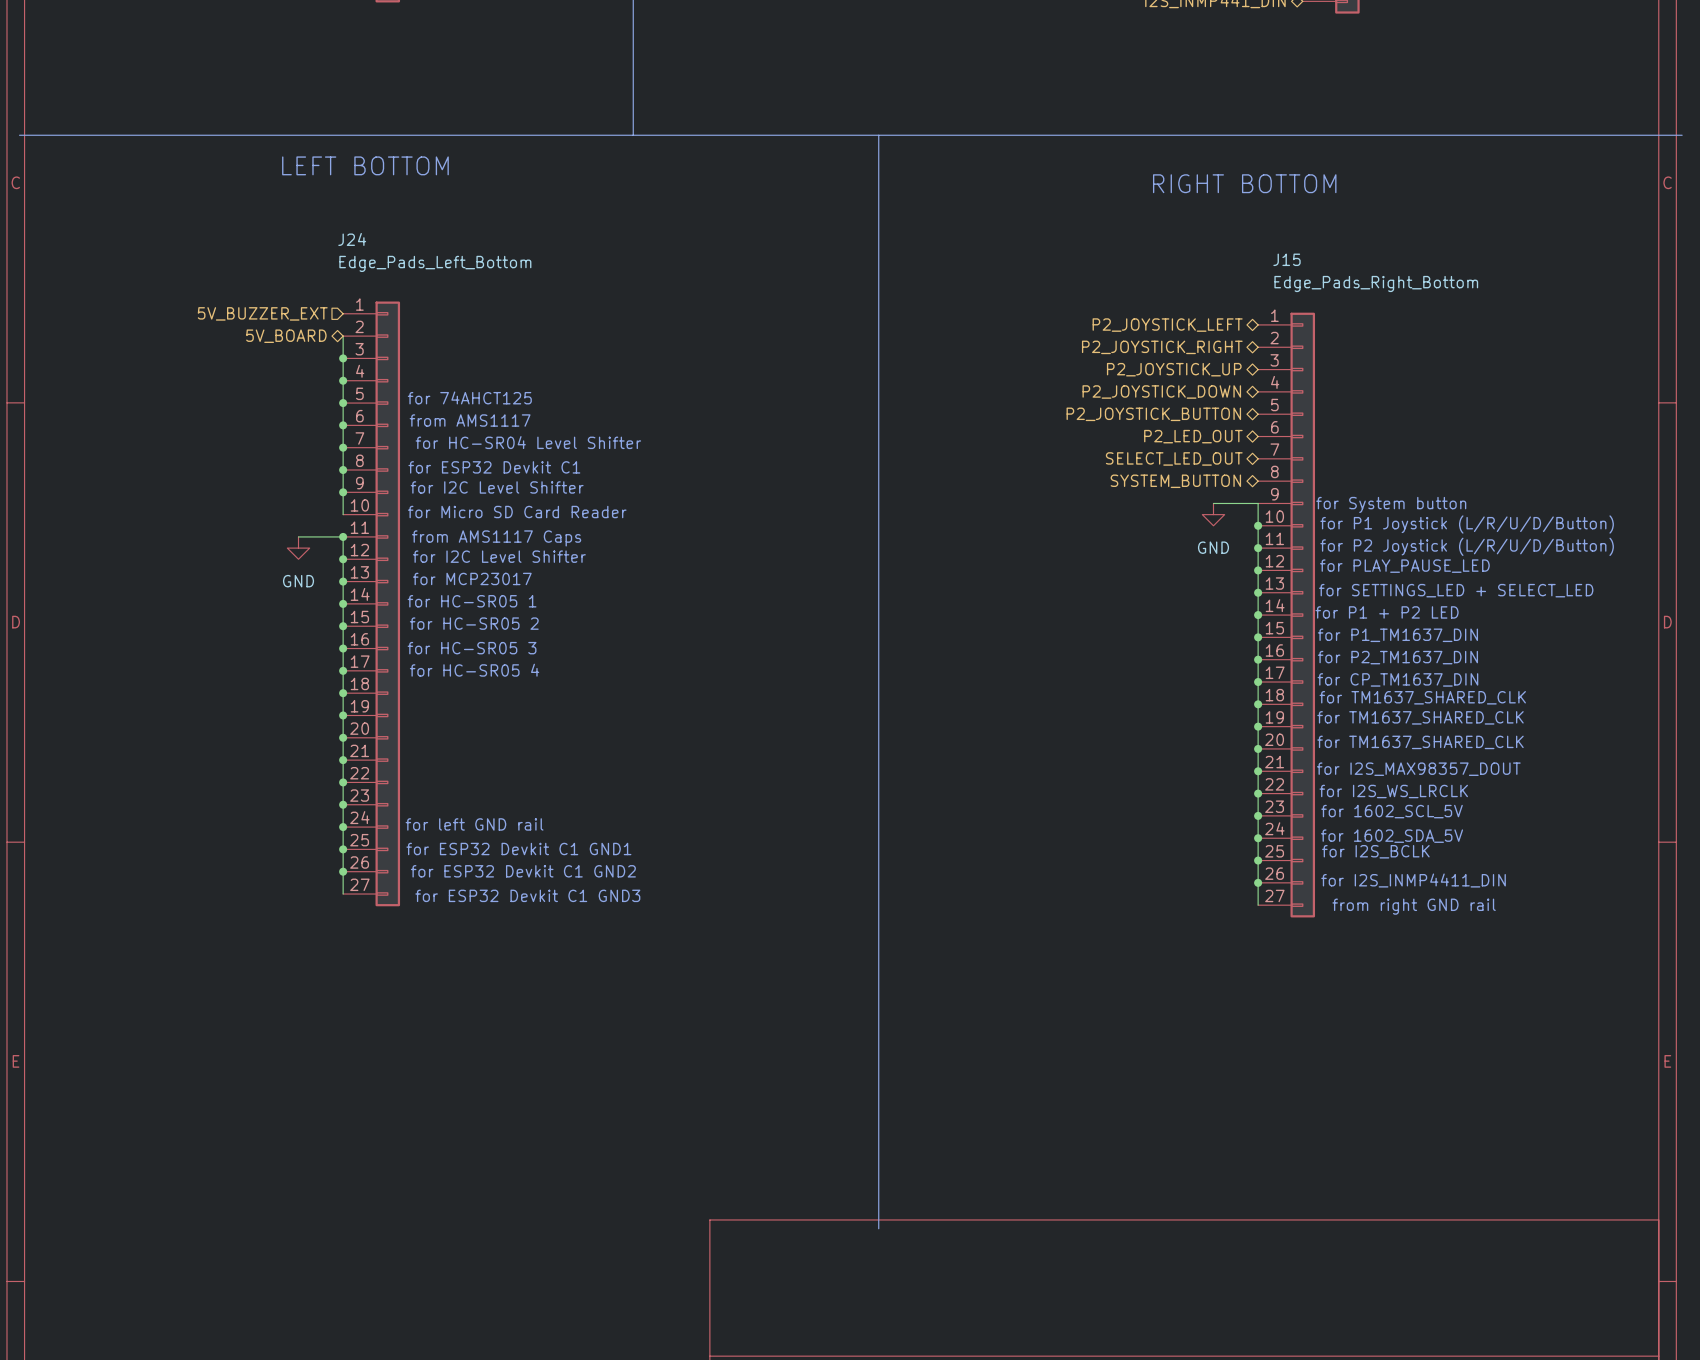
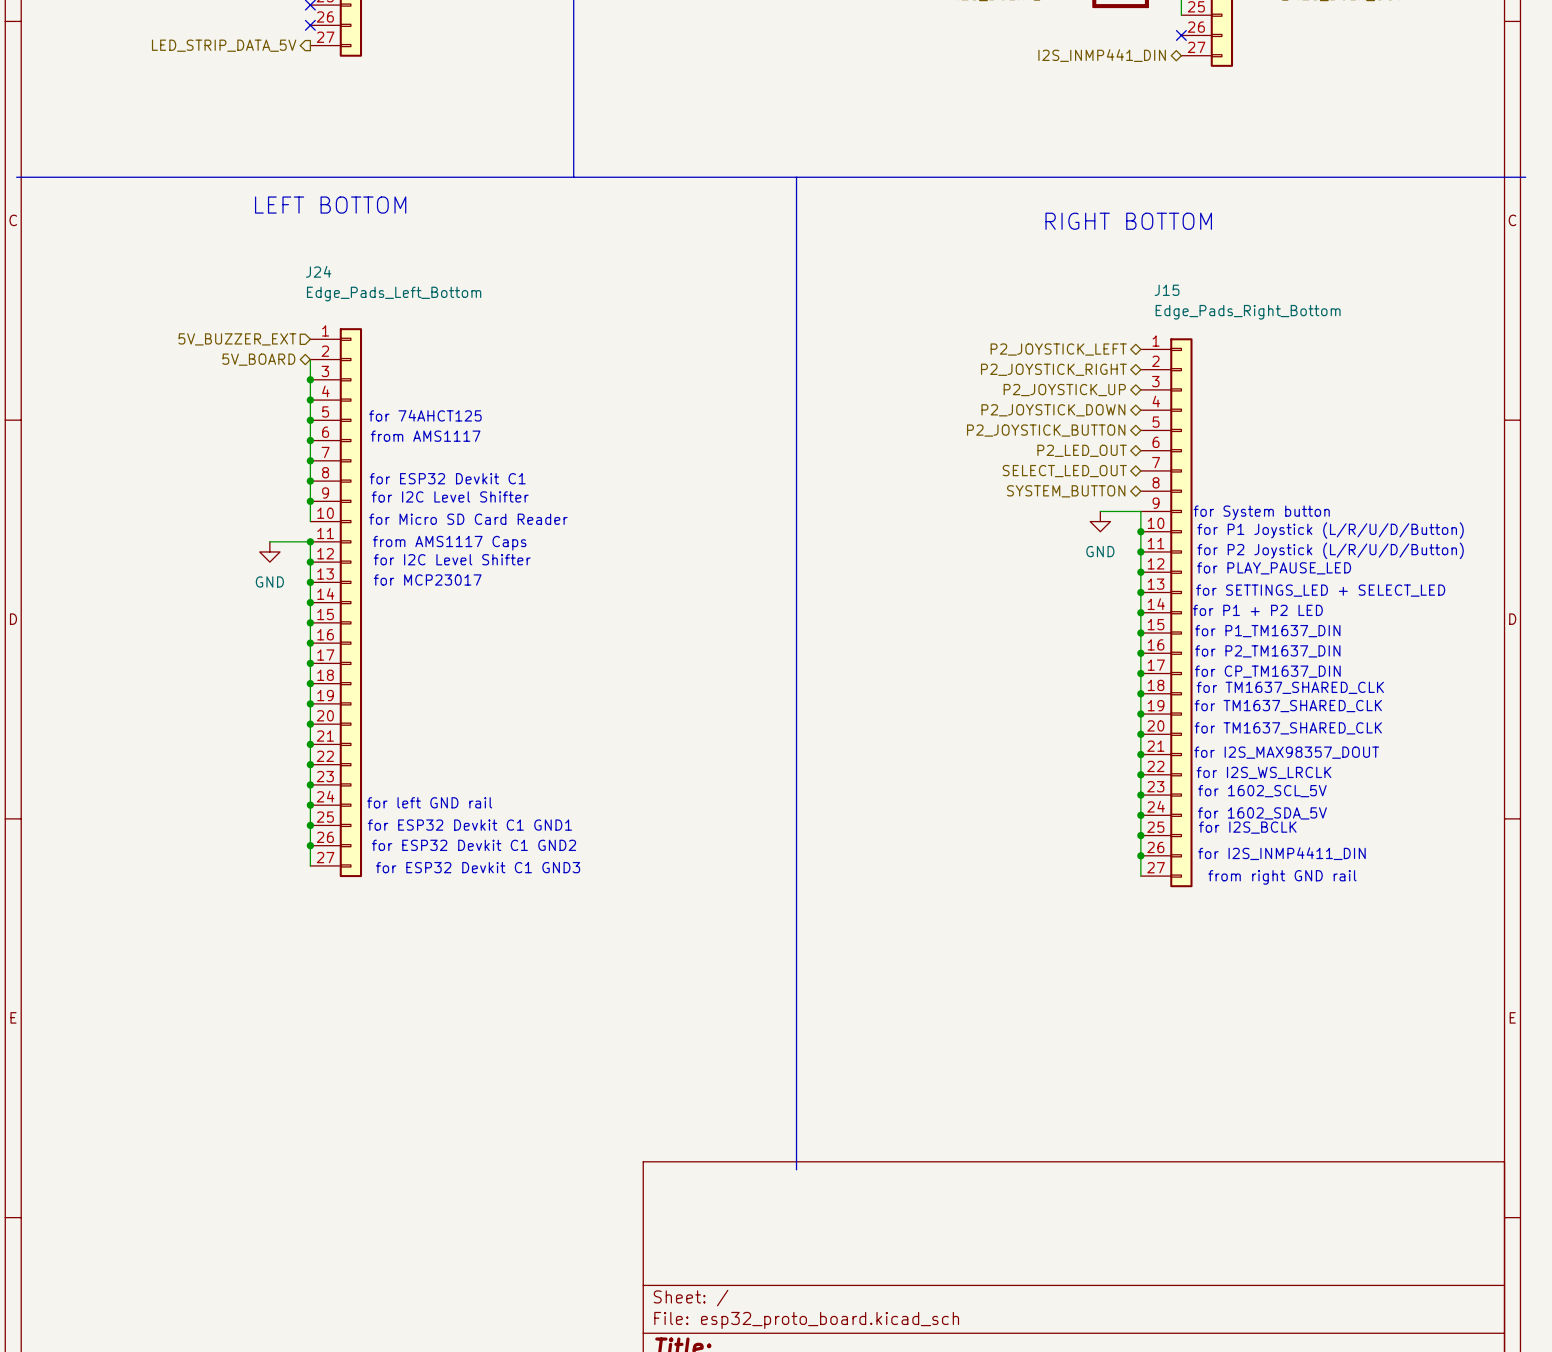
text: for HC-SR04 Level Shifter (528, 442) -> none
text: for HC-SR05 1 (472, 601) -> none
text: for HC-SR05 2 (474, 623) -> none
text: for HC-SR05 3 (472, 648) -> none
text: for HC-SR05 4 (474, 670) -> none

